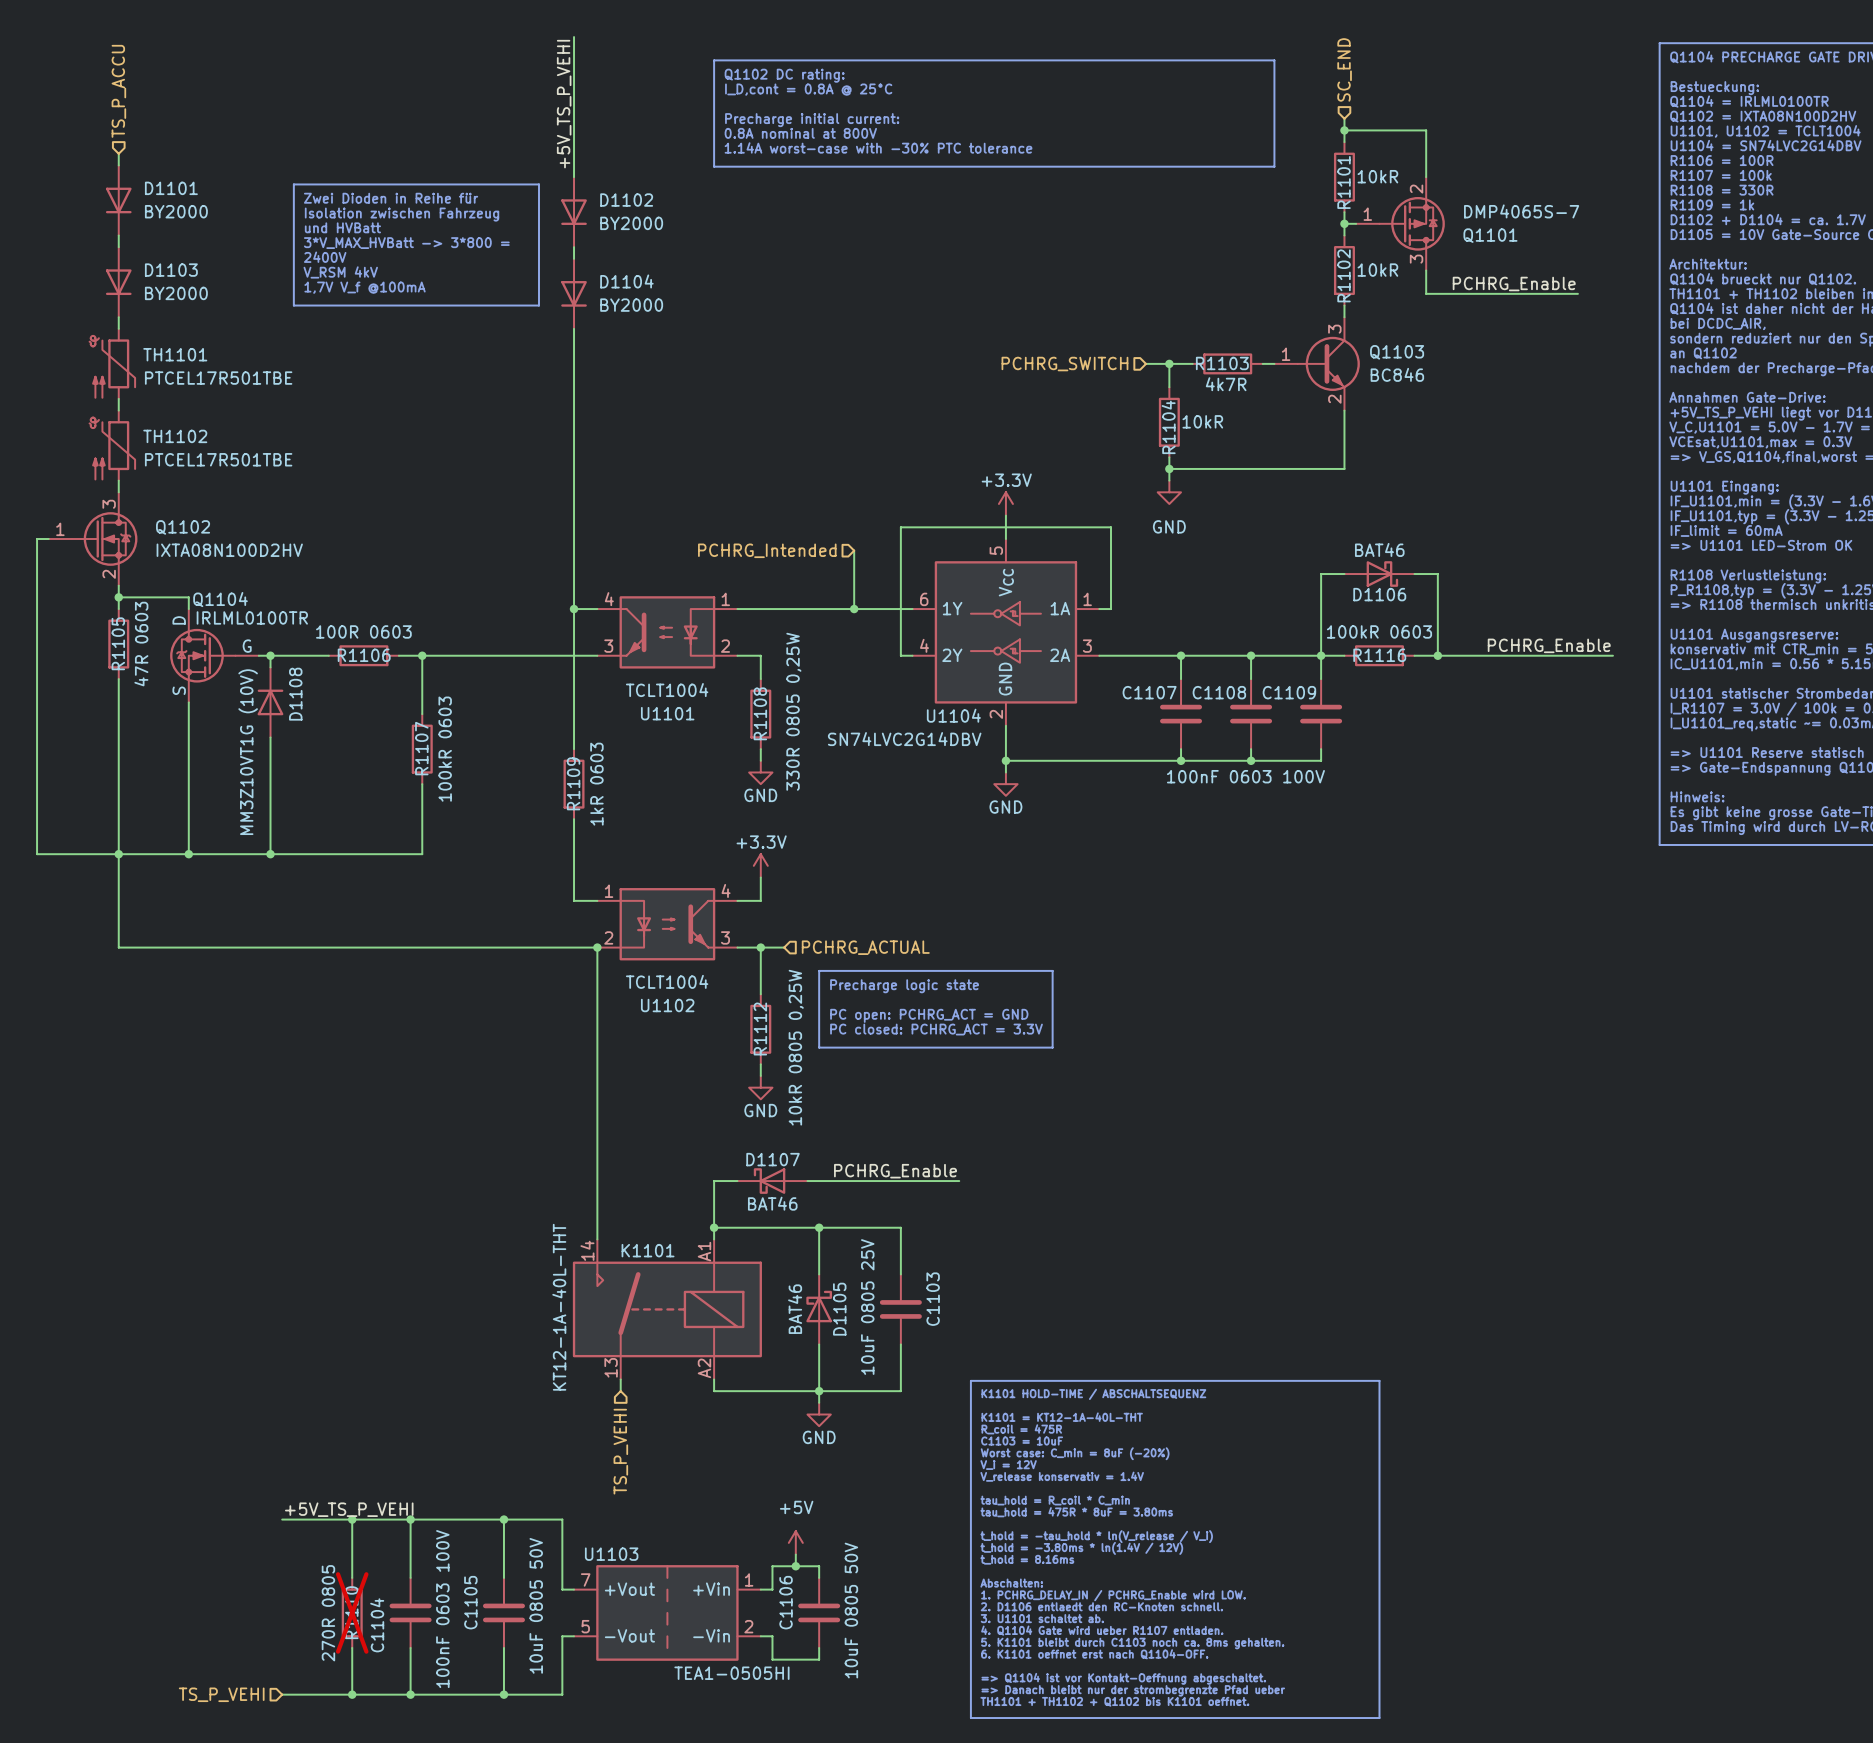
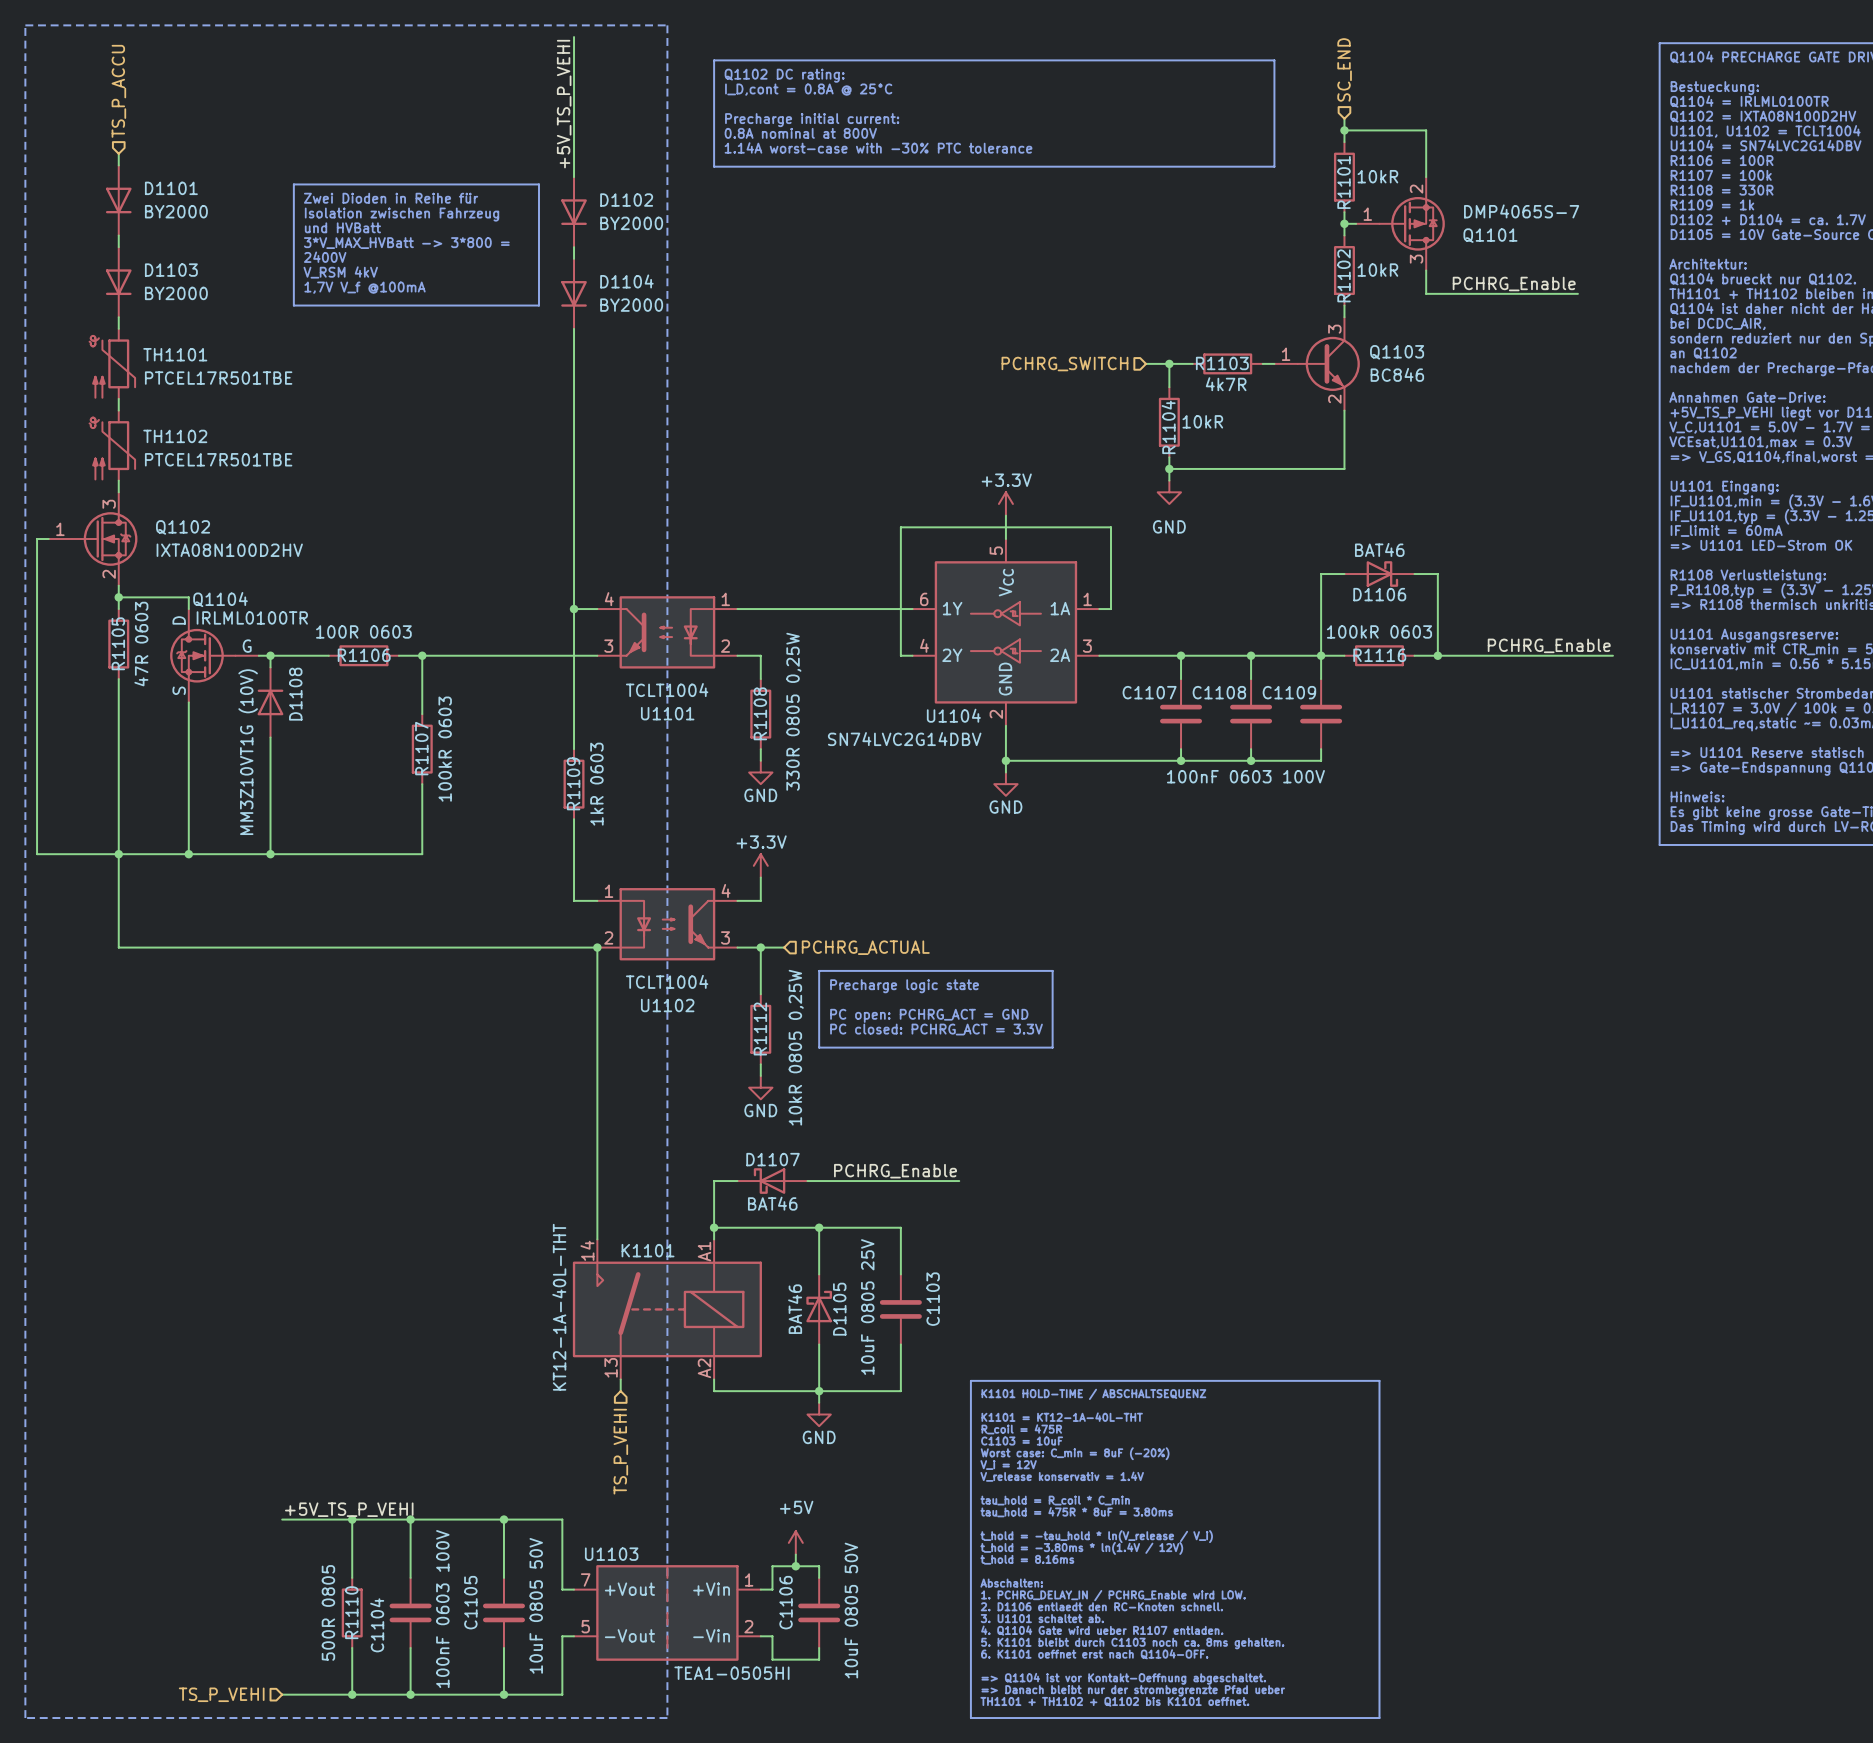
line: none -> (25, 25) (667, 25) (667, 1718) (25, 1718) (25, 25)
hierarchical label: PCHRG_Intended (767, 550) -> none
wire: (854, 550) (854, 609) -> none
junction: (854, 609) -> none
R1110 do-not-place cross: (352, 1612) -> none
R1110 value: 270R 0805 (328, 1613) -> 500R 0805 (328, 1612)

